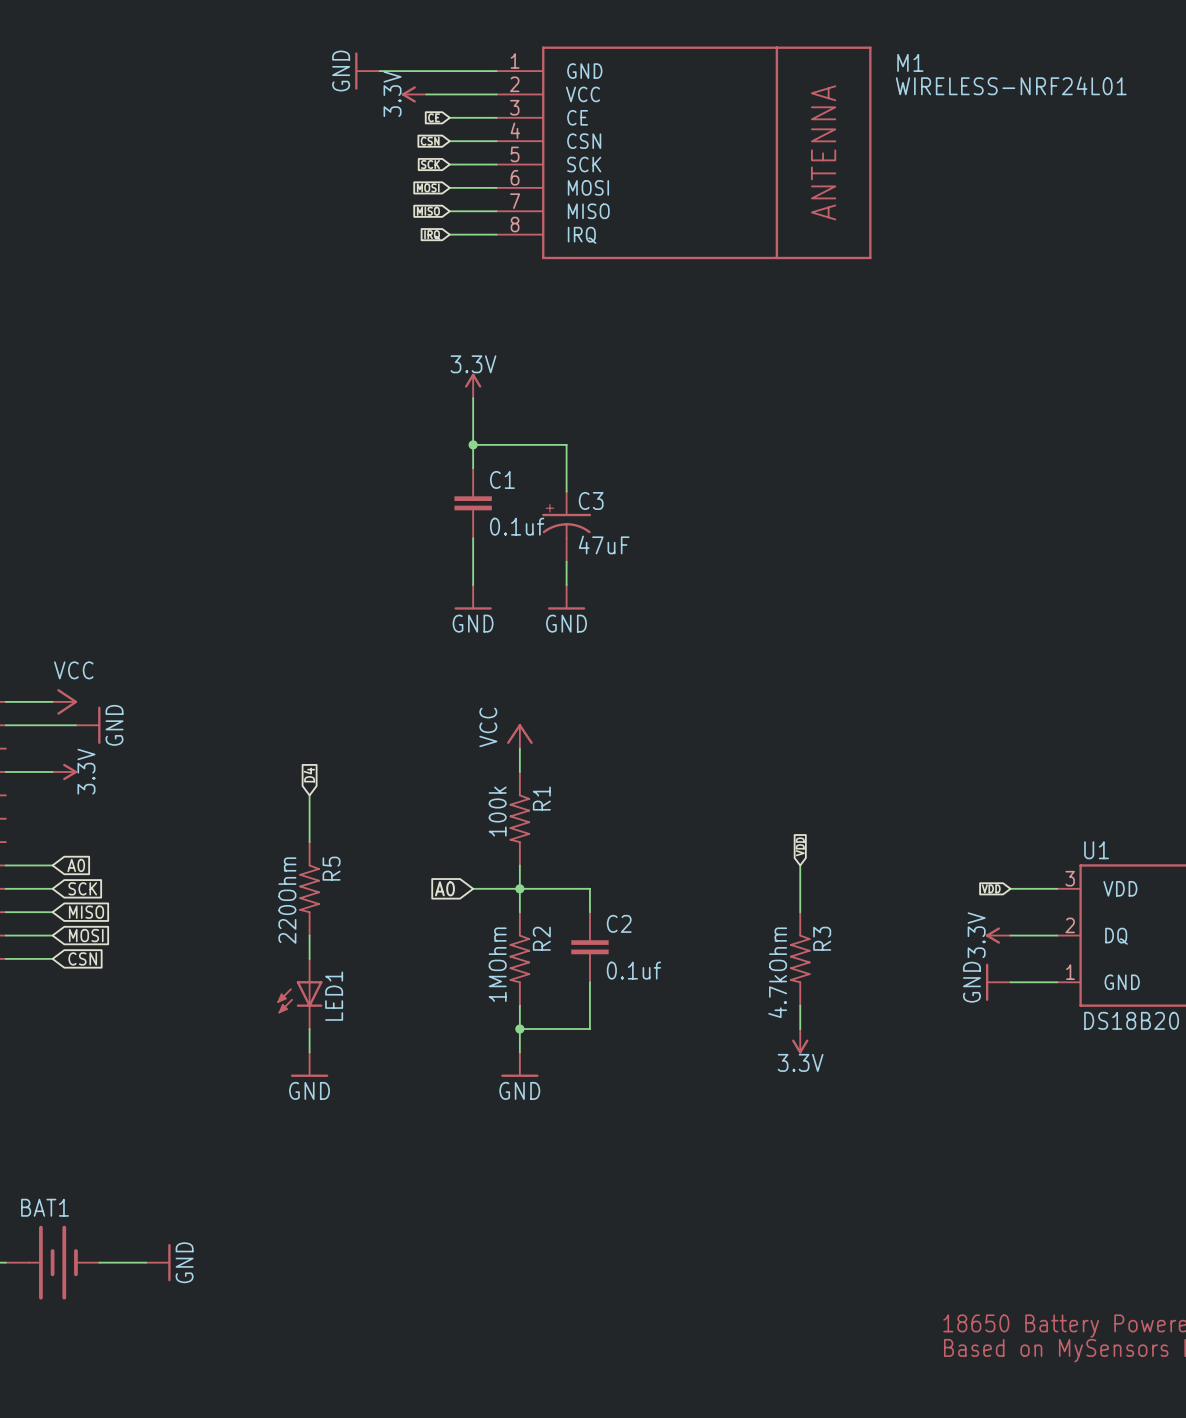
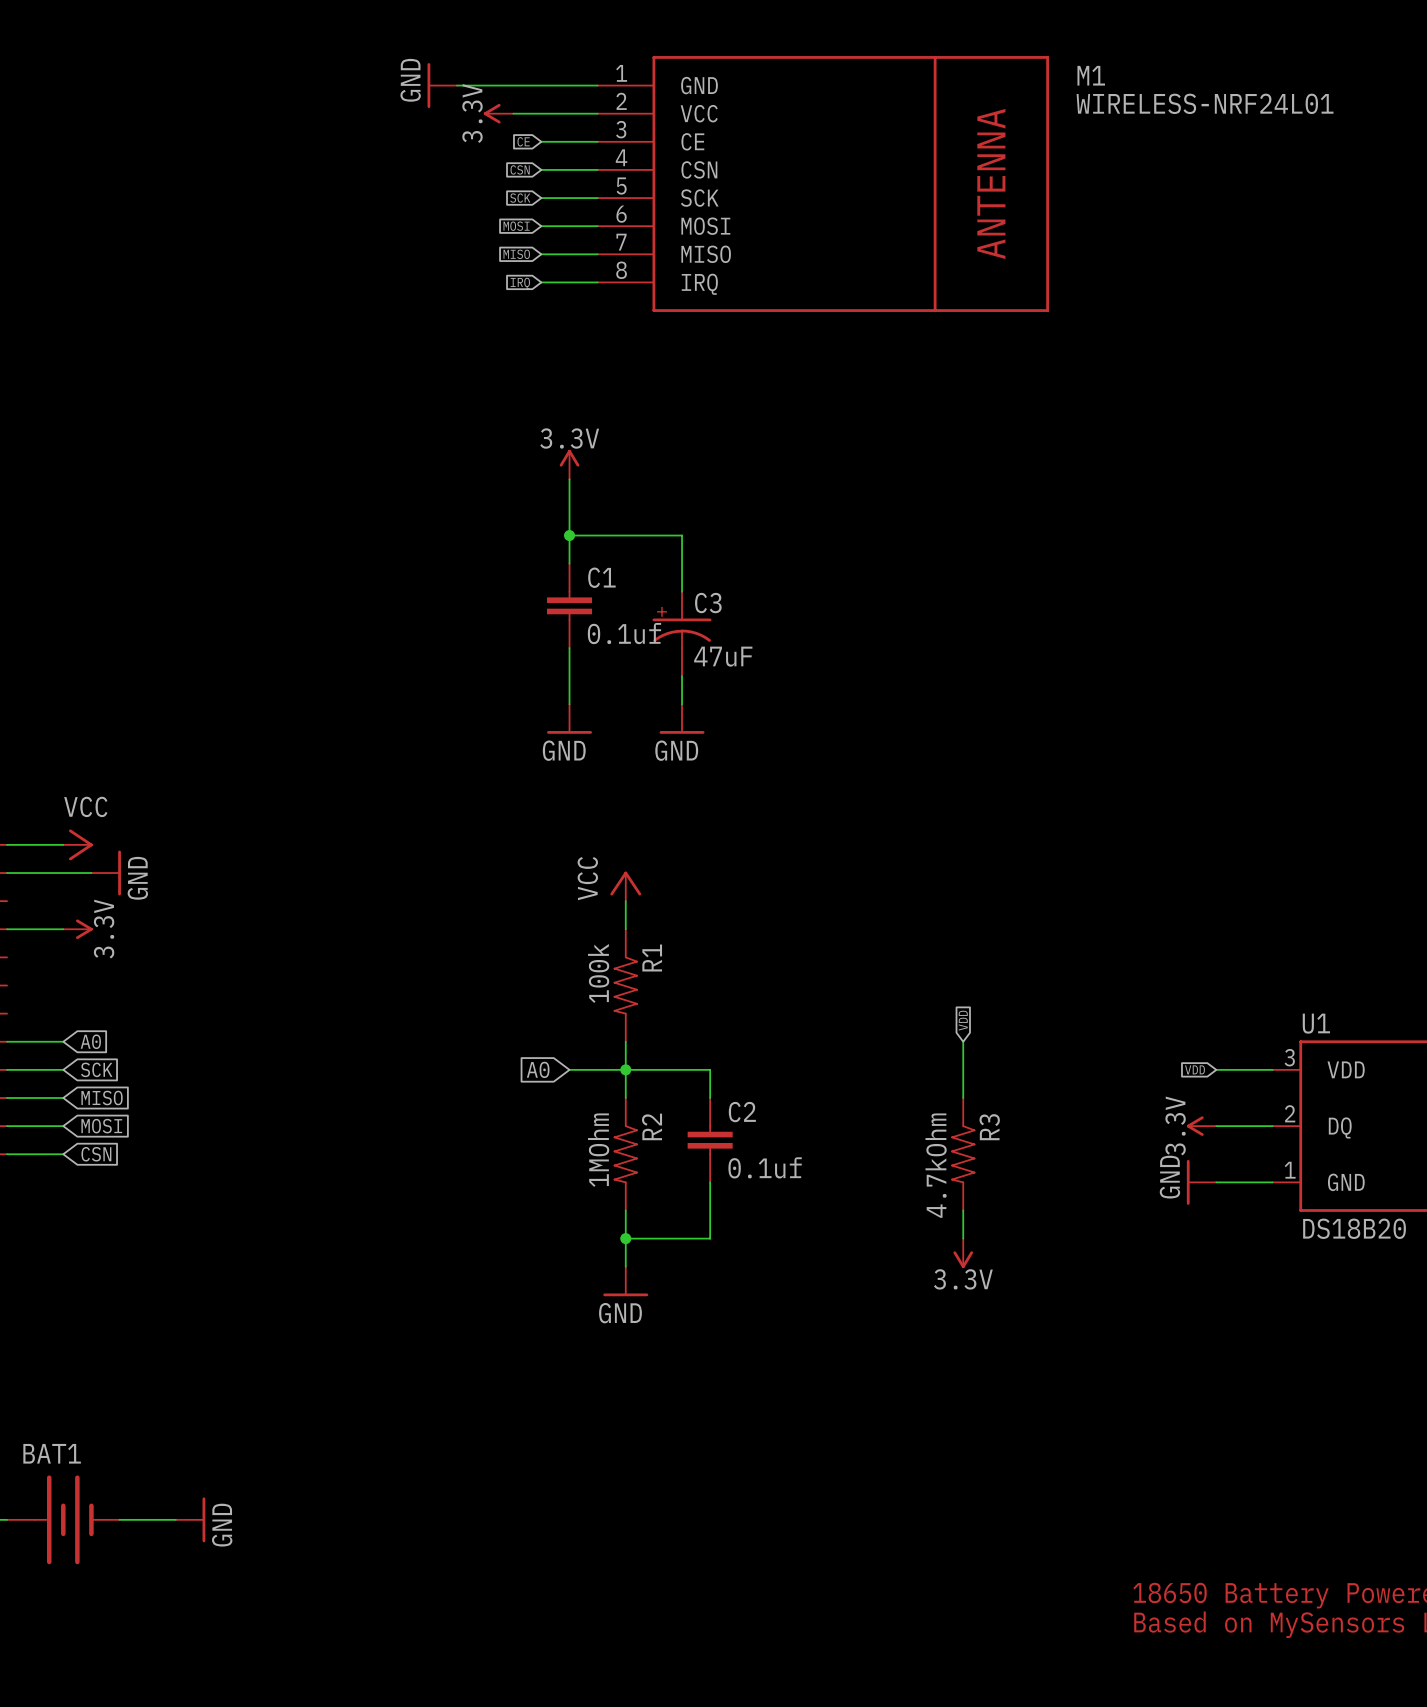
global label: D4 (309, 775) -> none
wire: (309, 795) (309, 842) -> none
R5: 220Ohm (309, 888) -> none
wire: (309, 935) (309, 958) -> none
LED1: (299, 993) -> none
wire: (309, 1029) (309, 1052) -> none
power symbol: GND (309, 1064) -> none

